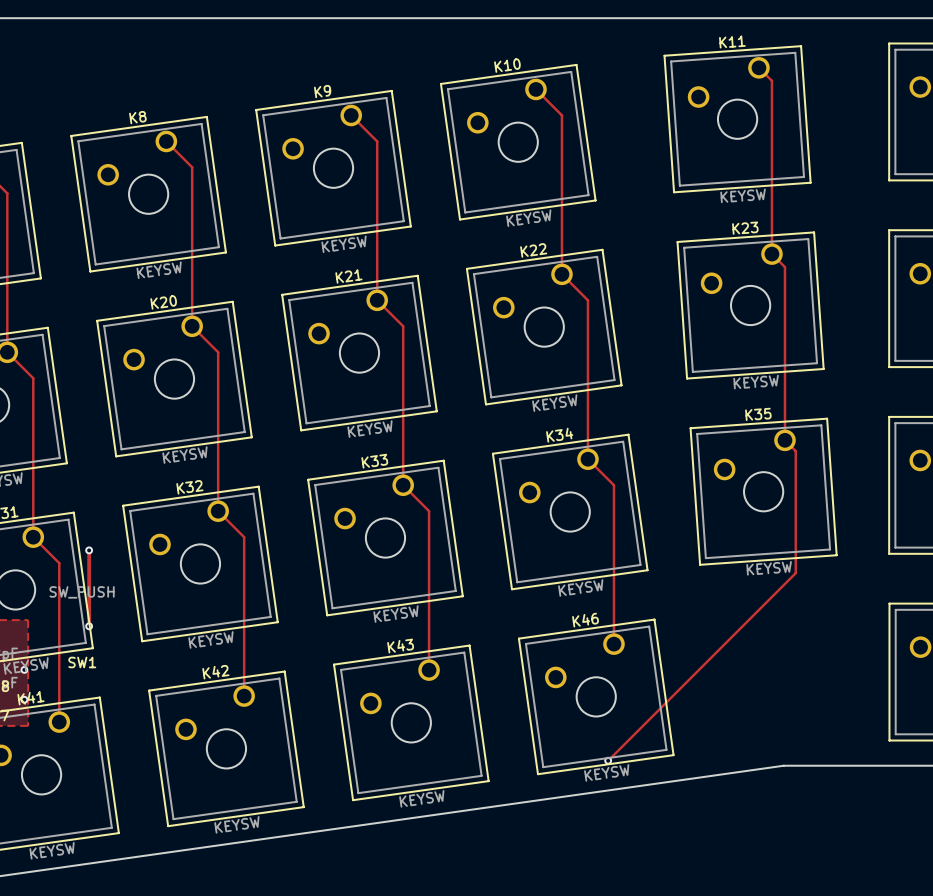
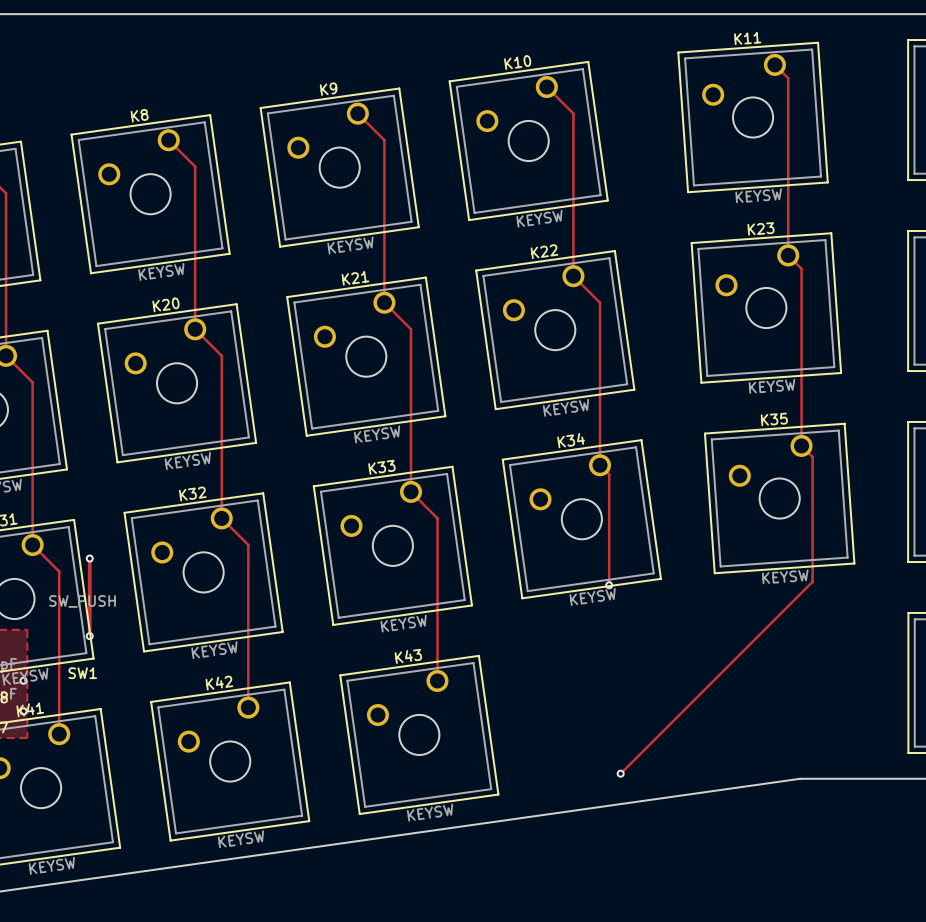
track: (596, 468) (613, 485) (613, 644) -> (609, 474) (609, 585)
via: none -> (609, 585)
K46: KEYSW (596, 696) -> none

